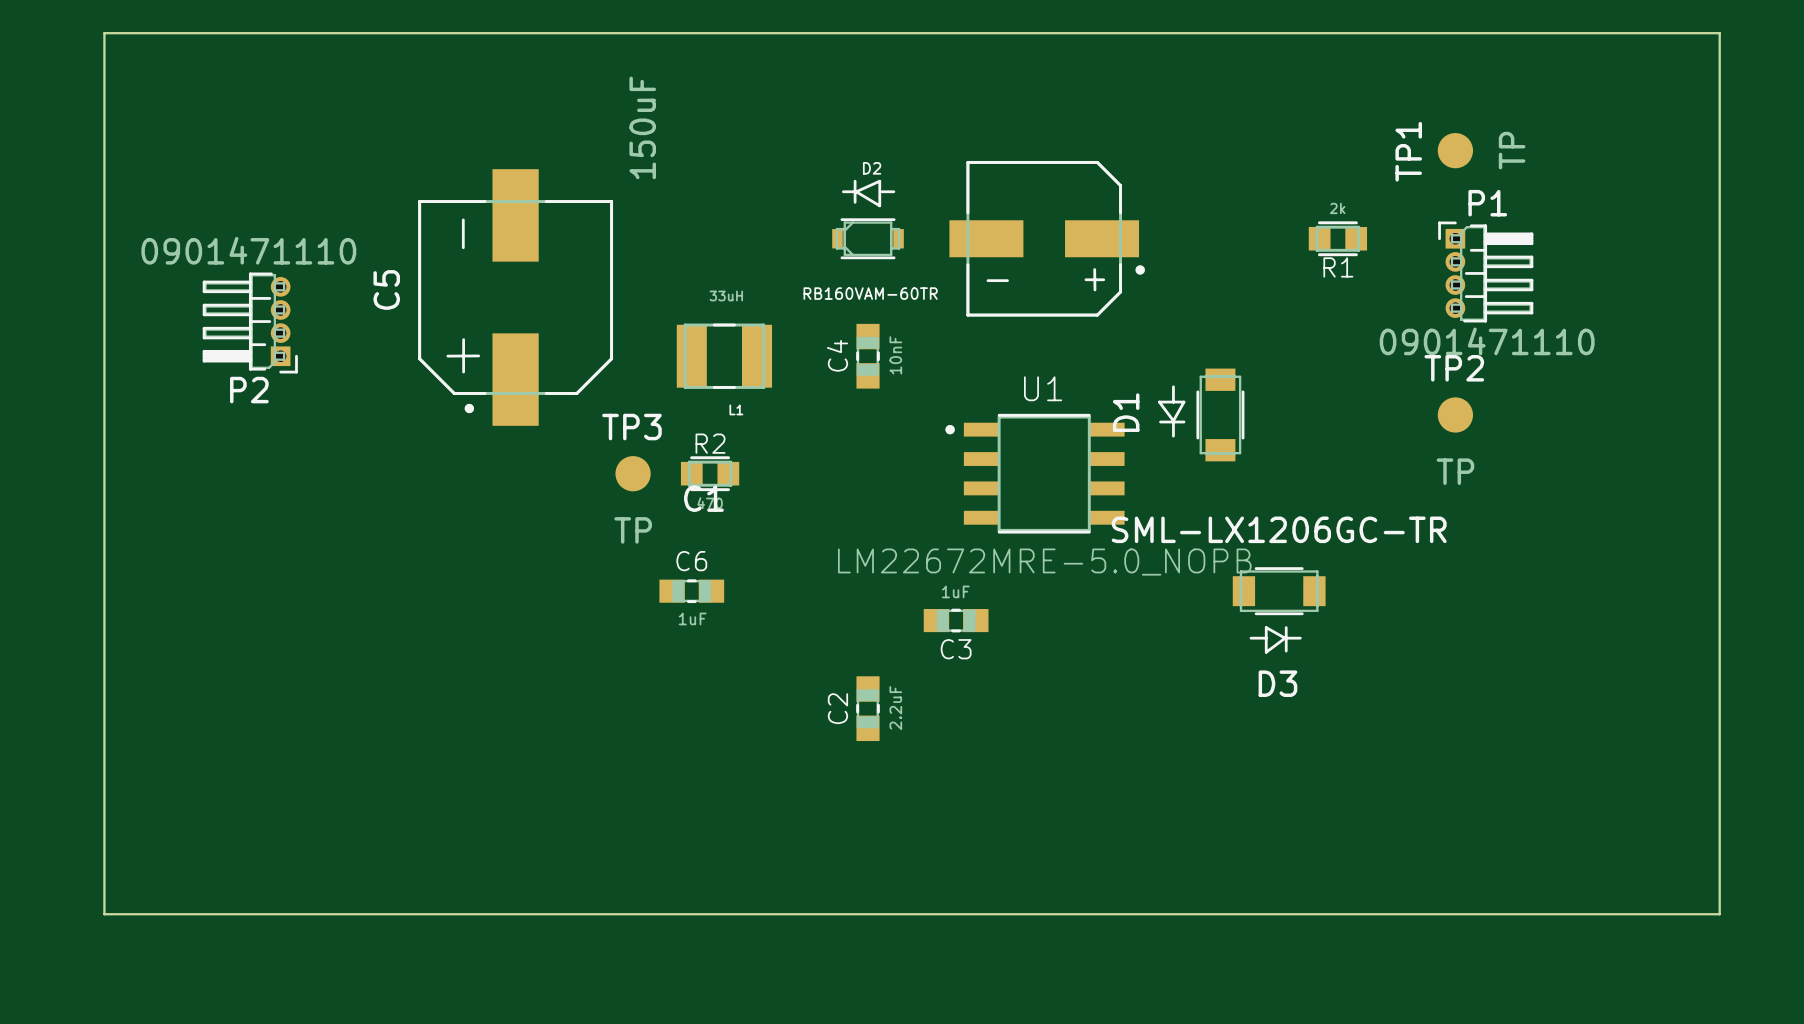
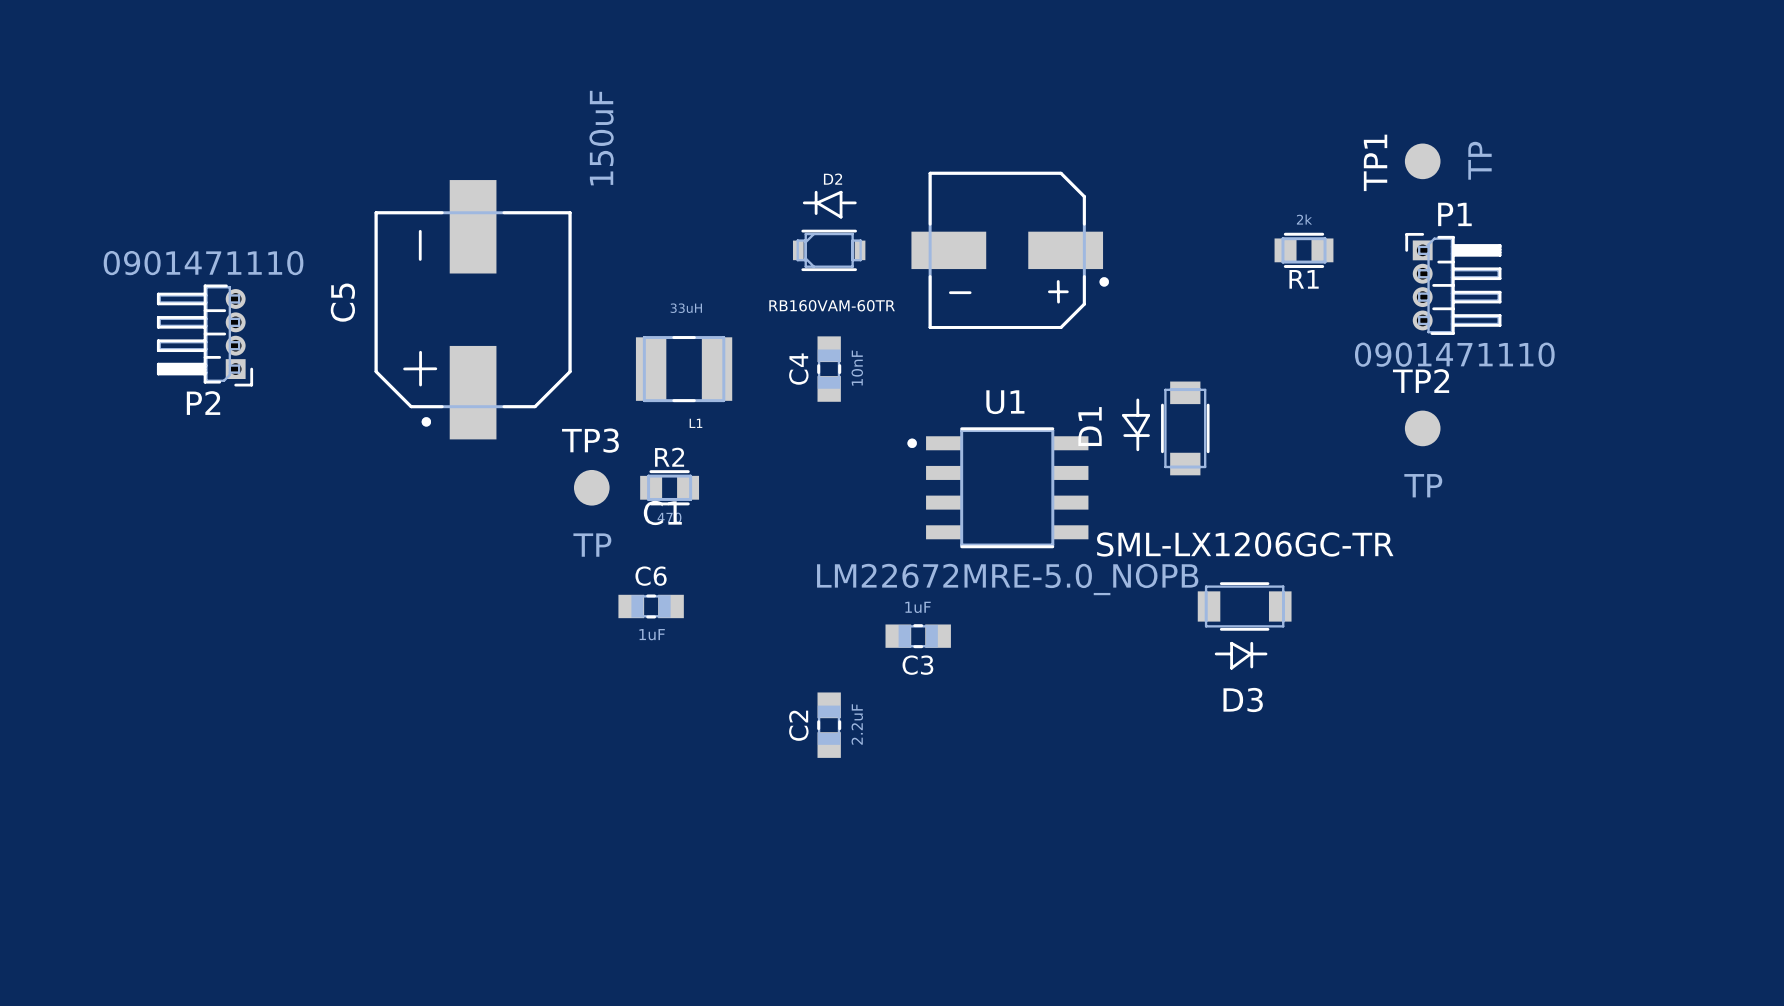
board edge: (104, 33) (1719, 33) (1719, 914) (104, 914) (104, 33) -> none

